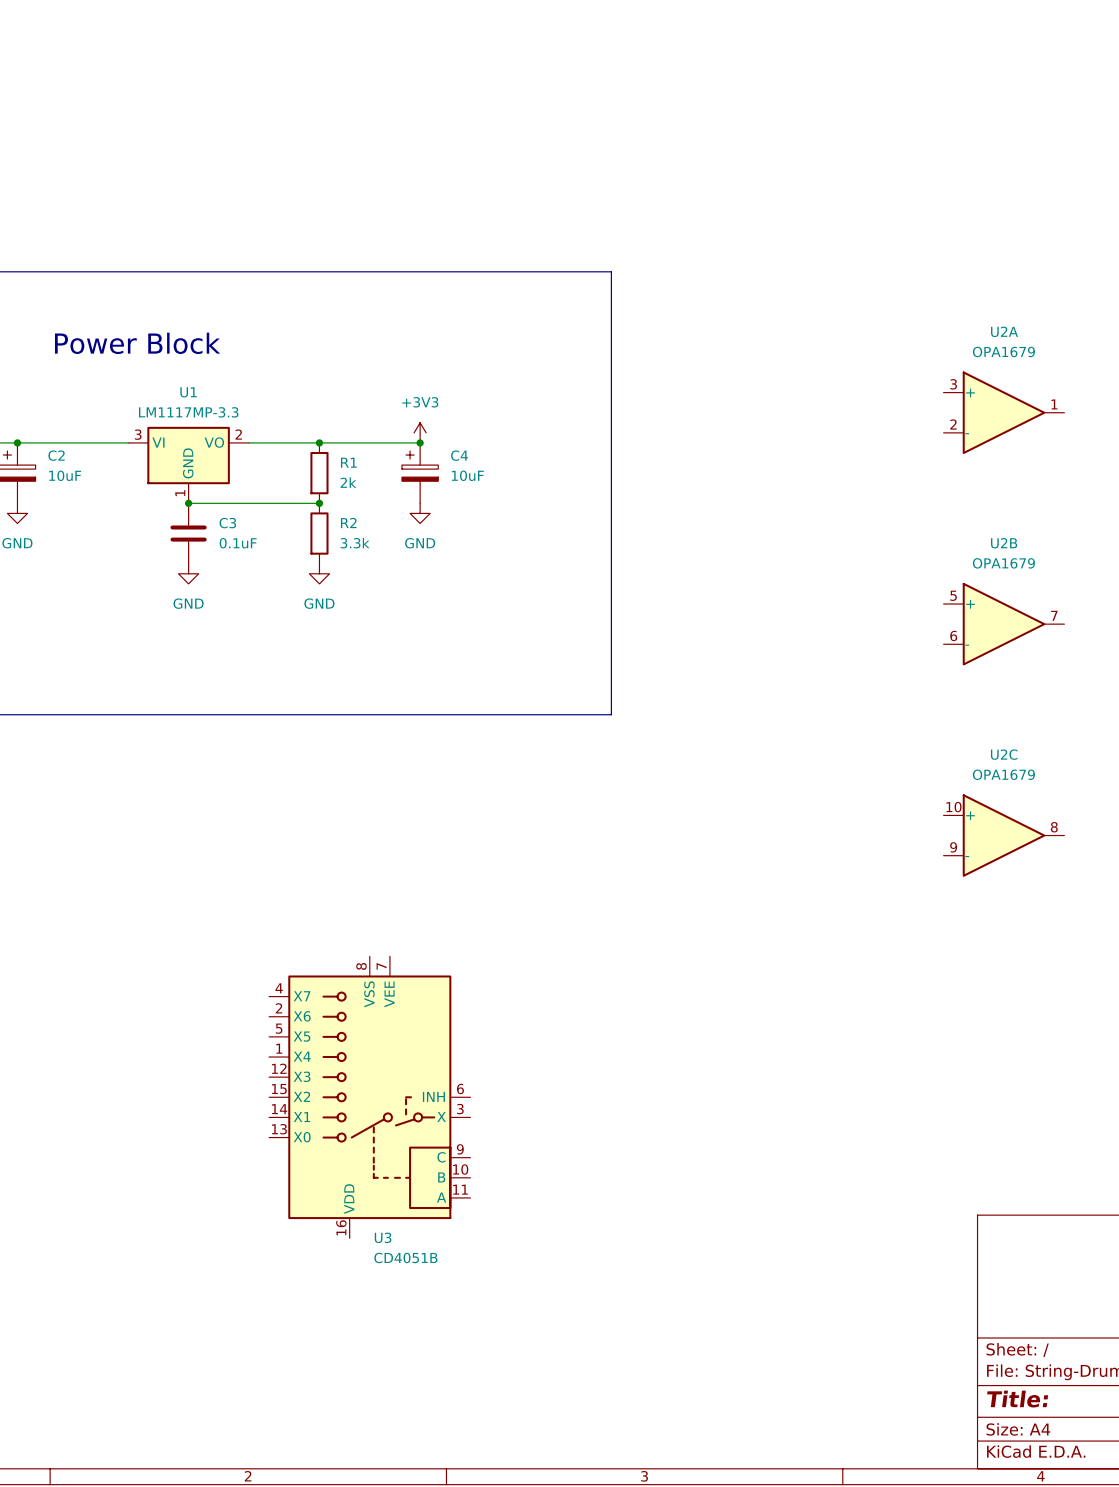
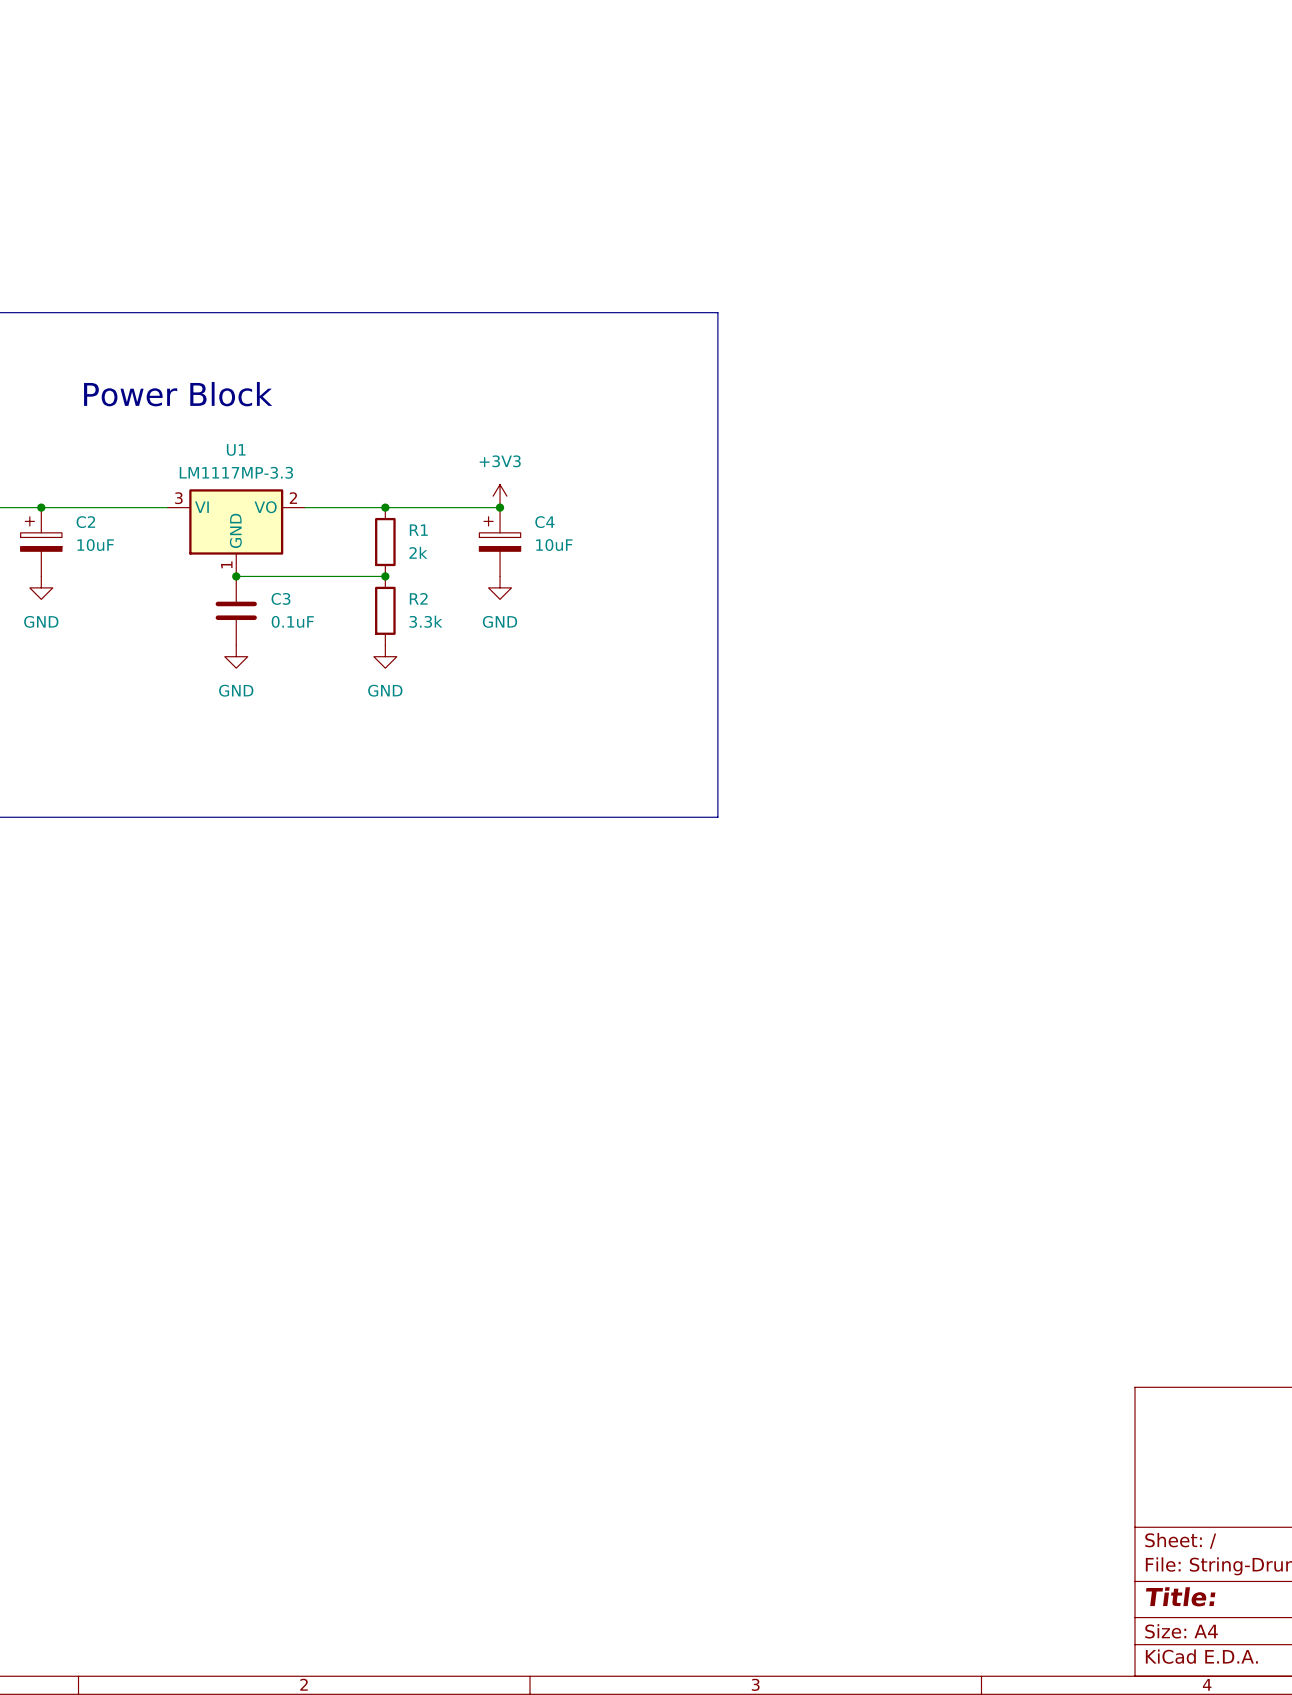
U2A: OPA1679 (1004, 412) -> none
U2B: OPA1679 (1004, 624) -> none
U2C: OPA1679 (1004, 835) -> none
U3: CD4051B (369, 1097) -> none

